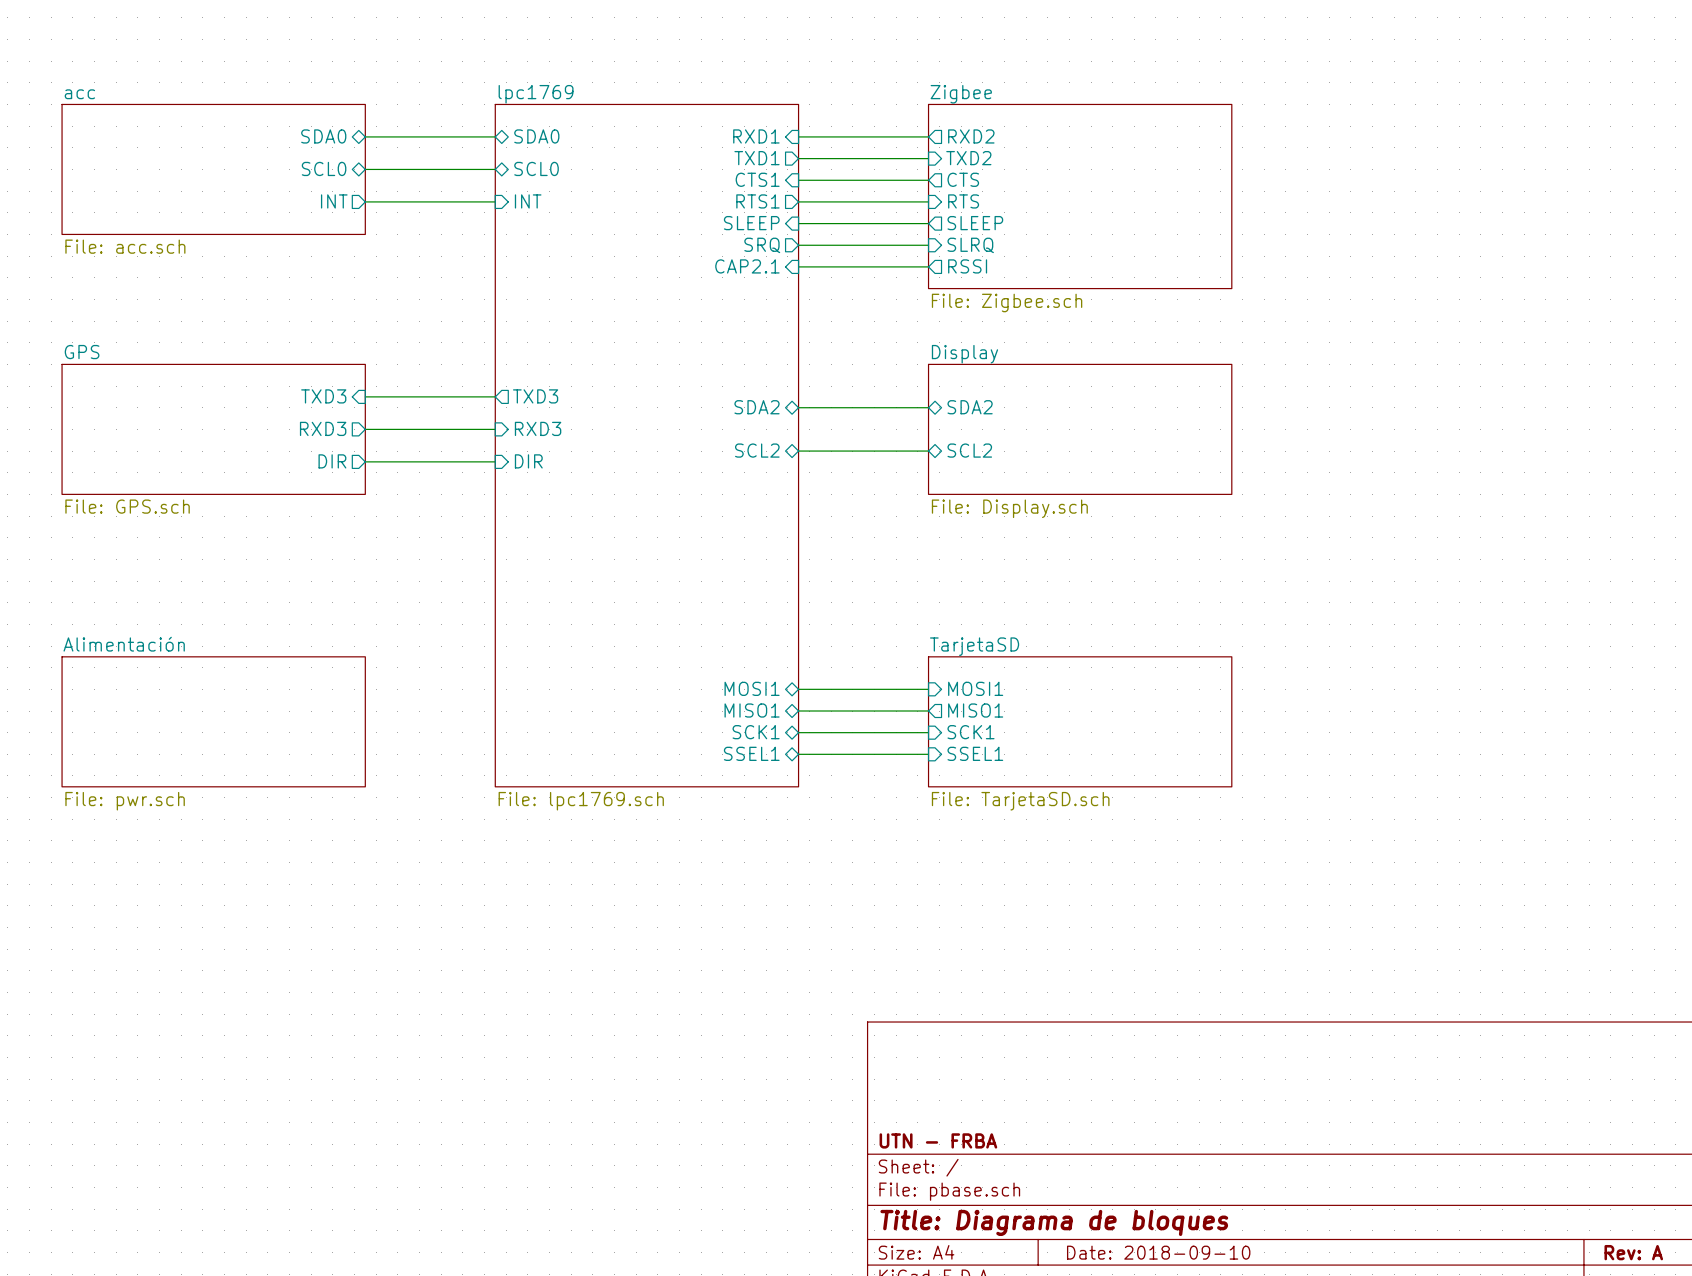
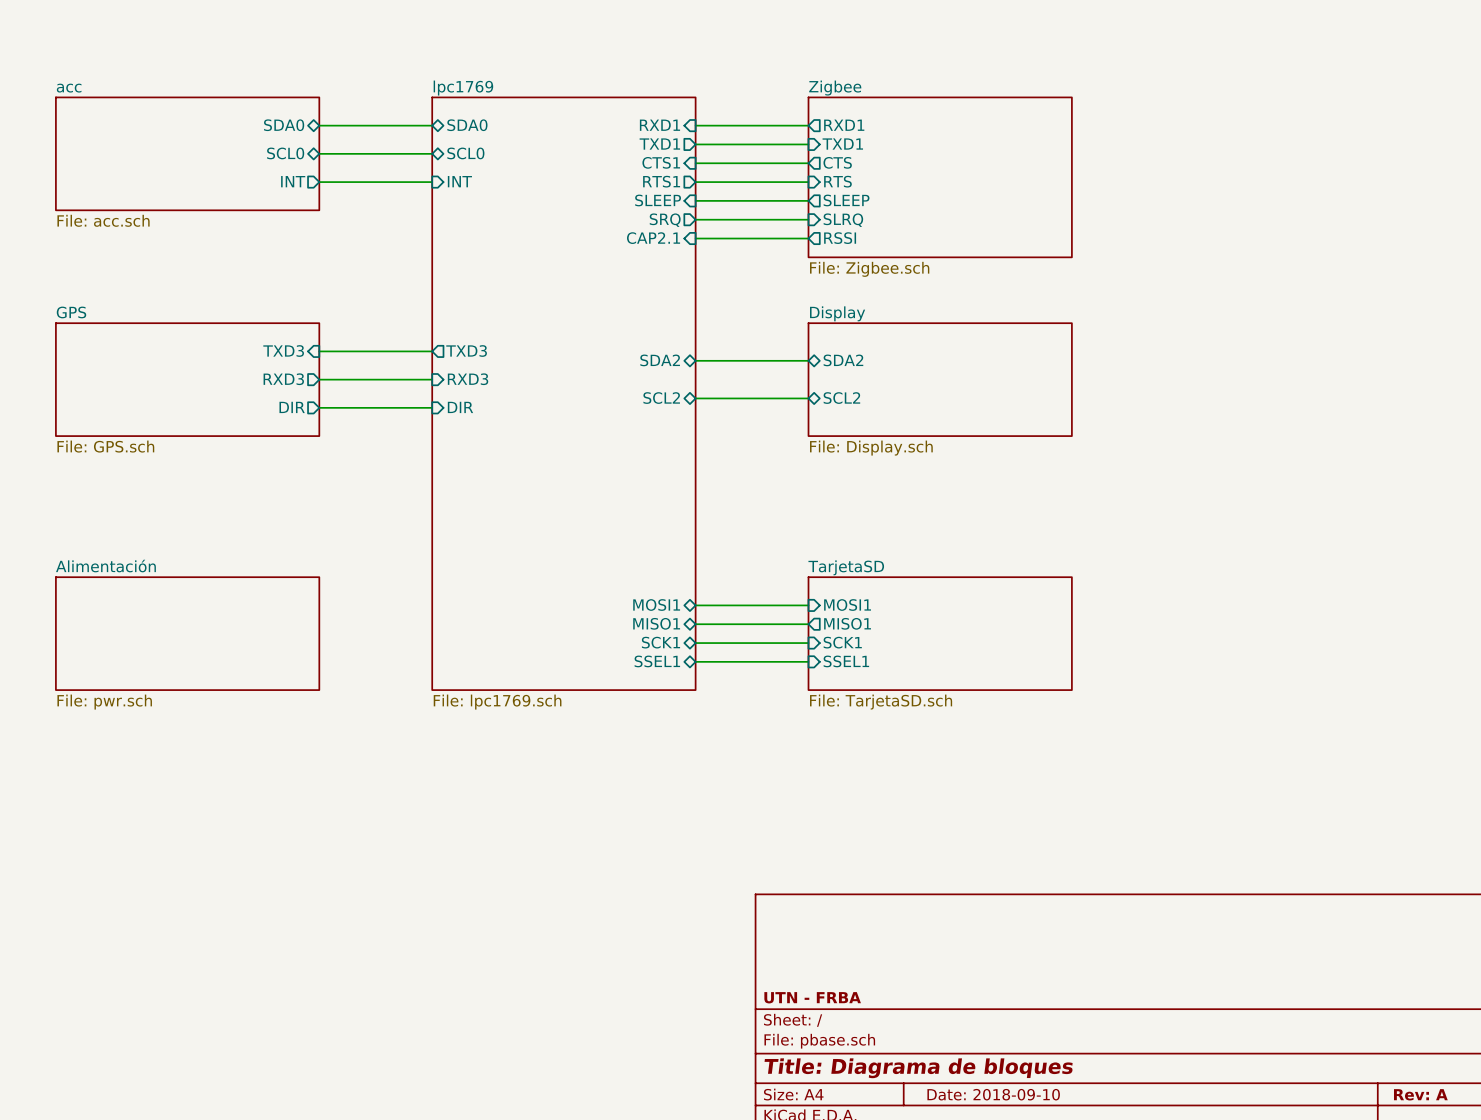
sheet pin: RXD2 (971, 136) -> RXD1 (844, 125)
sheet pin: TXD2 (968, 158) -> TXD1 (842, 144)

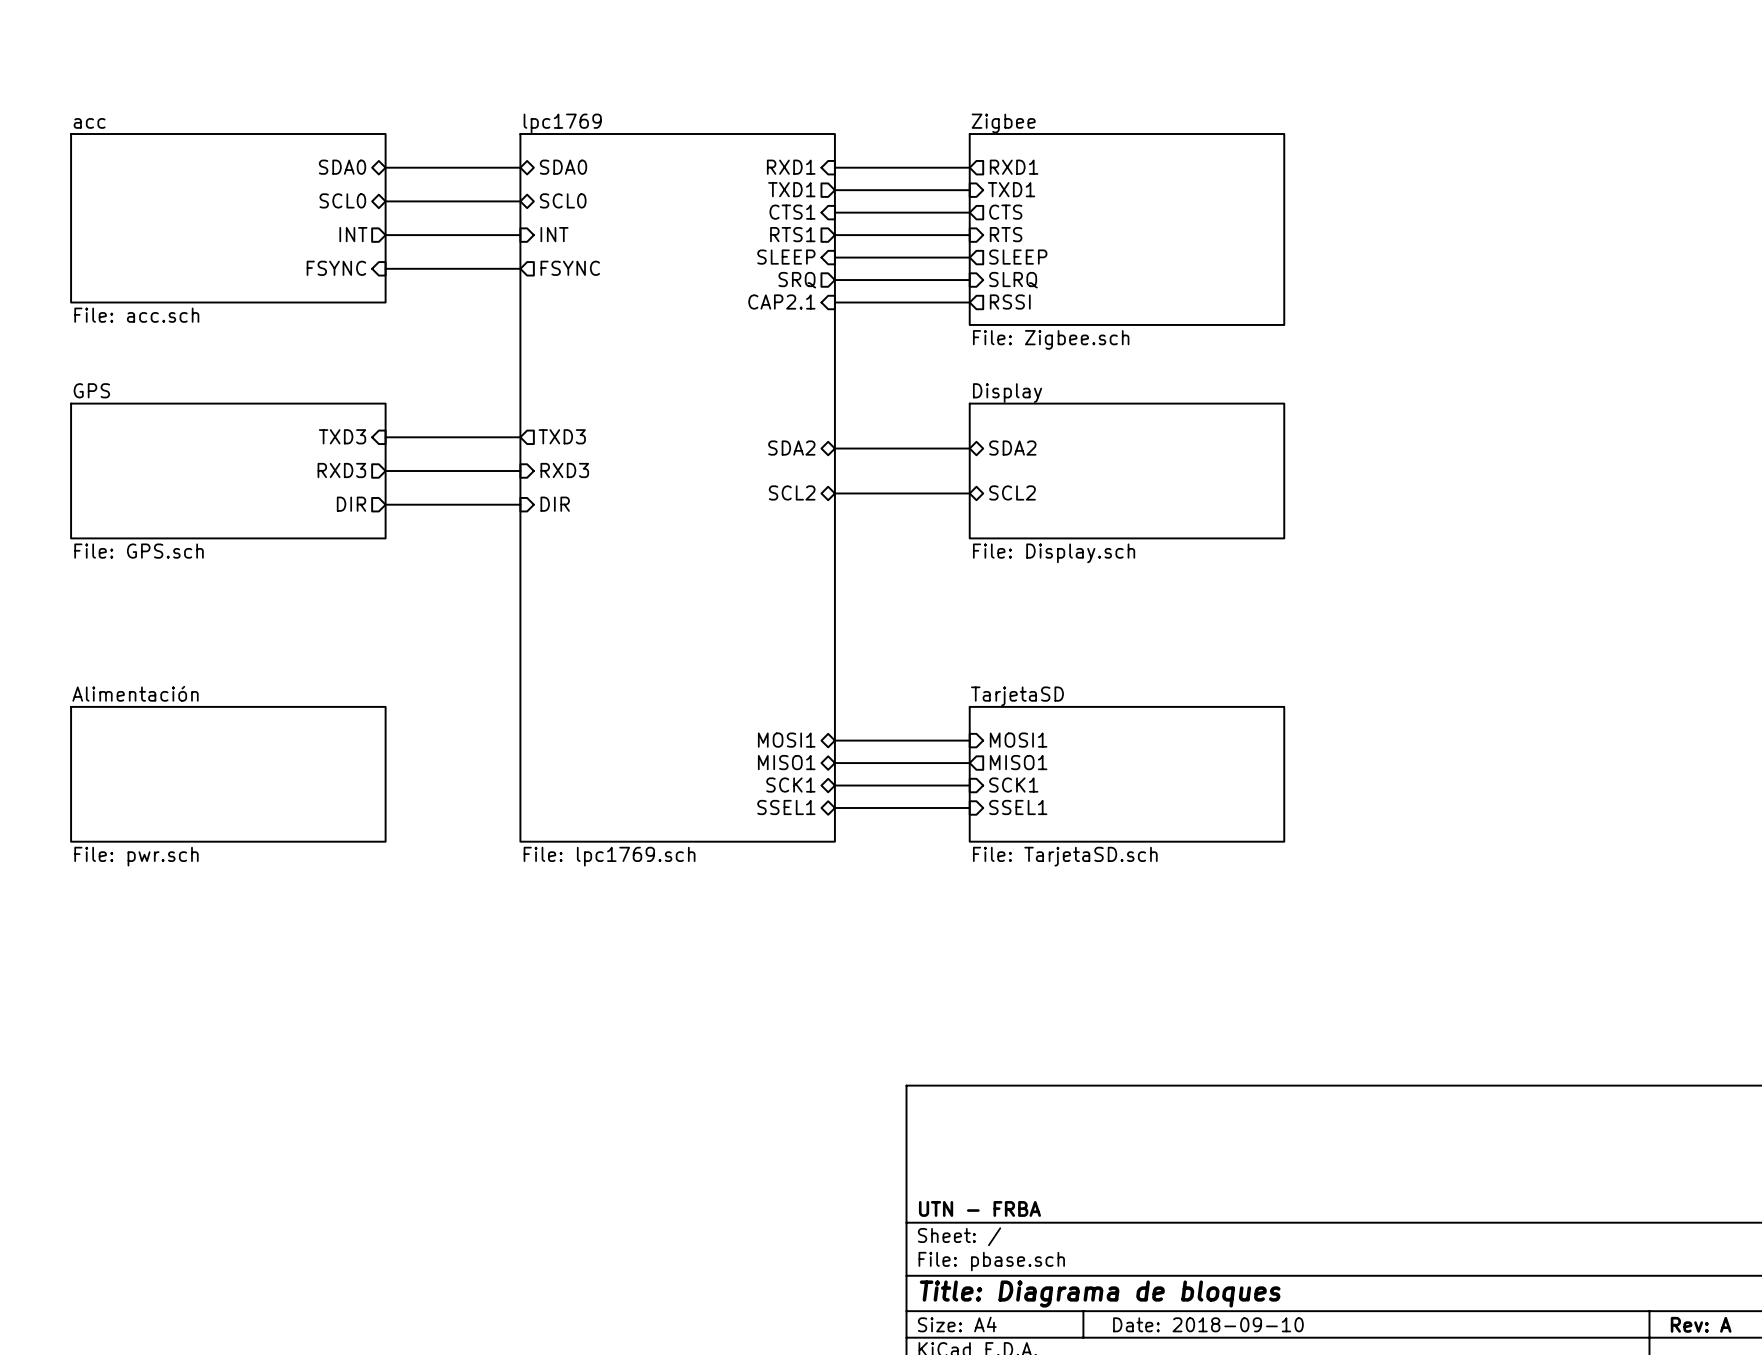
sheet acc: File: acc.sch (187, 153) -> none
sheet acc: none -> File: acc.sch (228, 218)
sheet pin: none -> FSYNC (336, 268)
sheet pin: none -> FSYNC (570, 268)
wire: none -> (385, 268) (520, 268)

